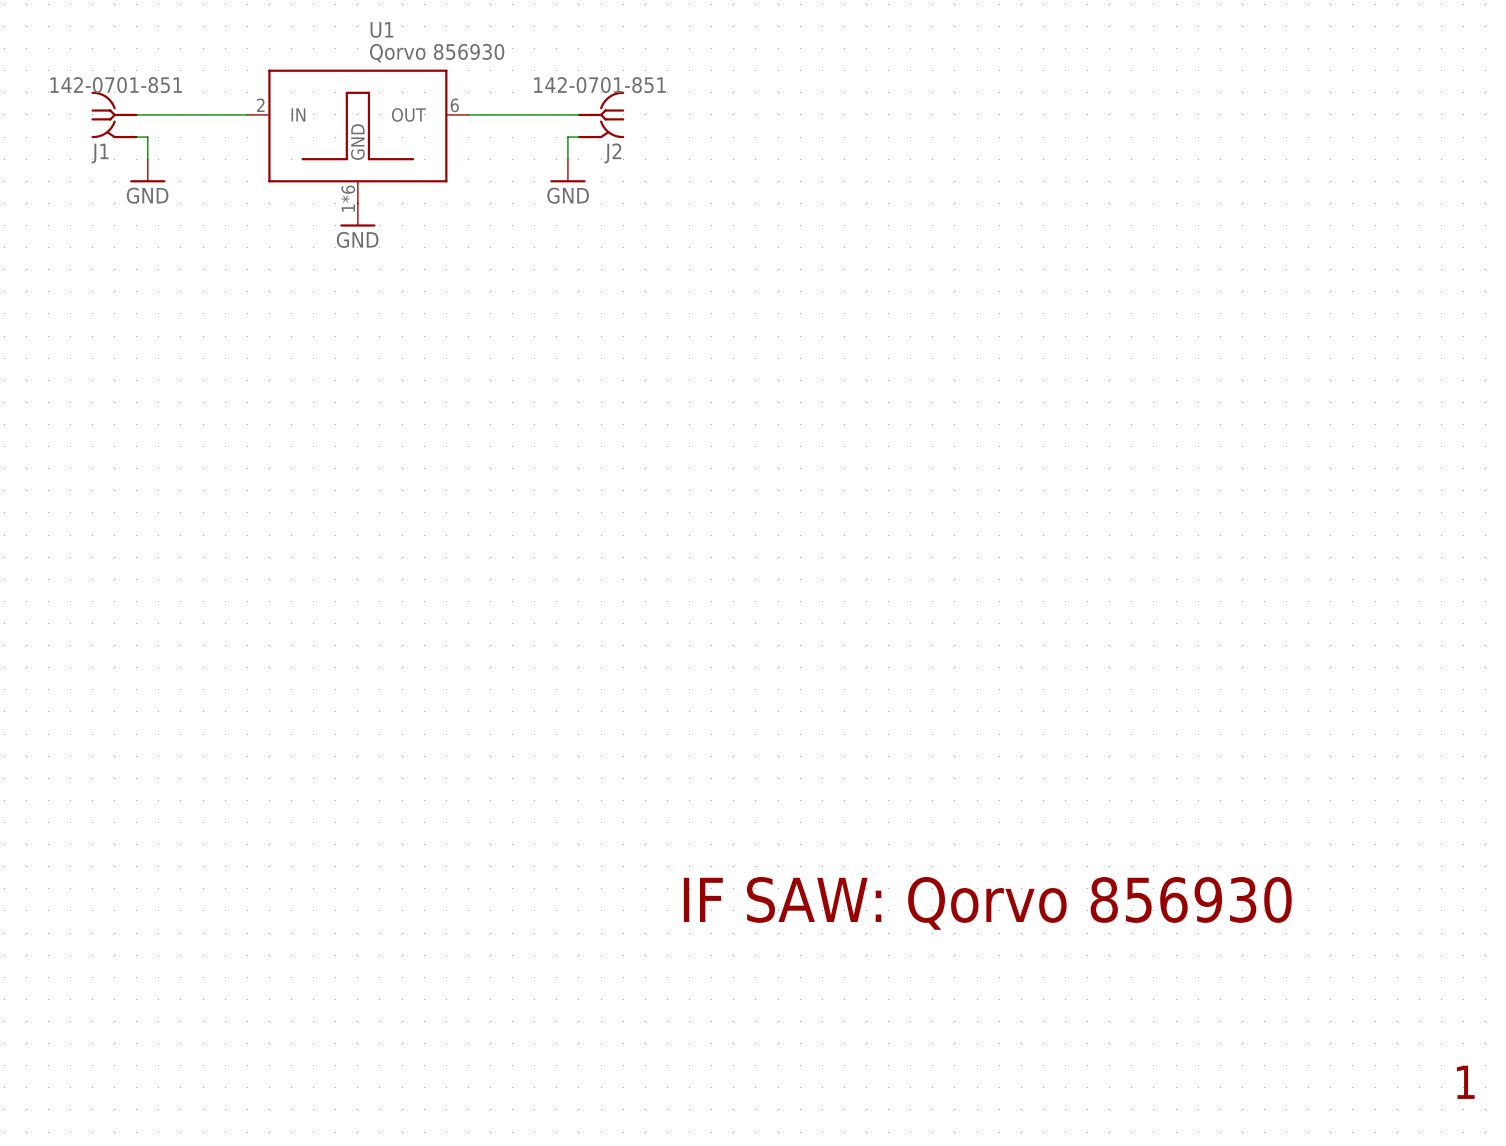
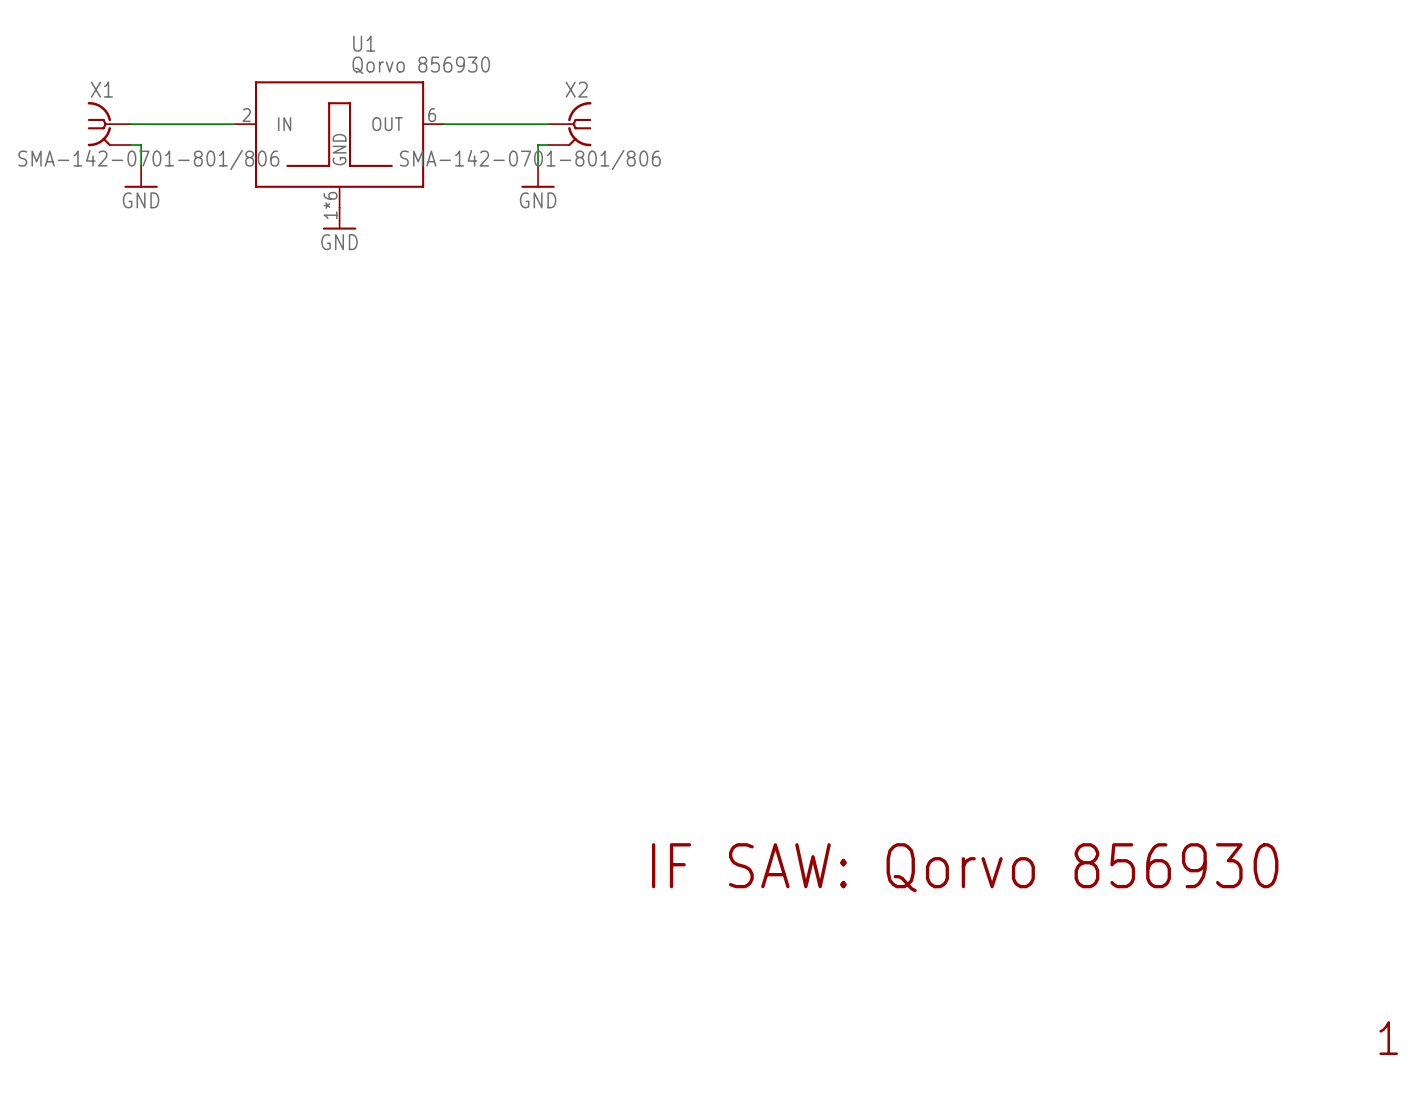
X1: none -> SMA-142-0701-801/806 (109, 124)
J1: 142-0701-851 (114, 114) -> none
J2: 142-0701-851 (601, 114) -> none
X2: none -> SMA-142-0701-801/806 (569, 124)

